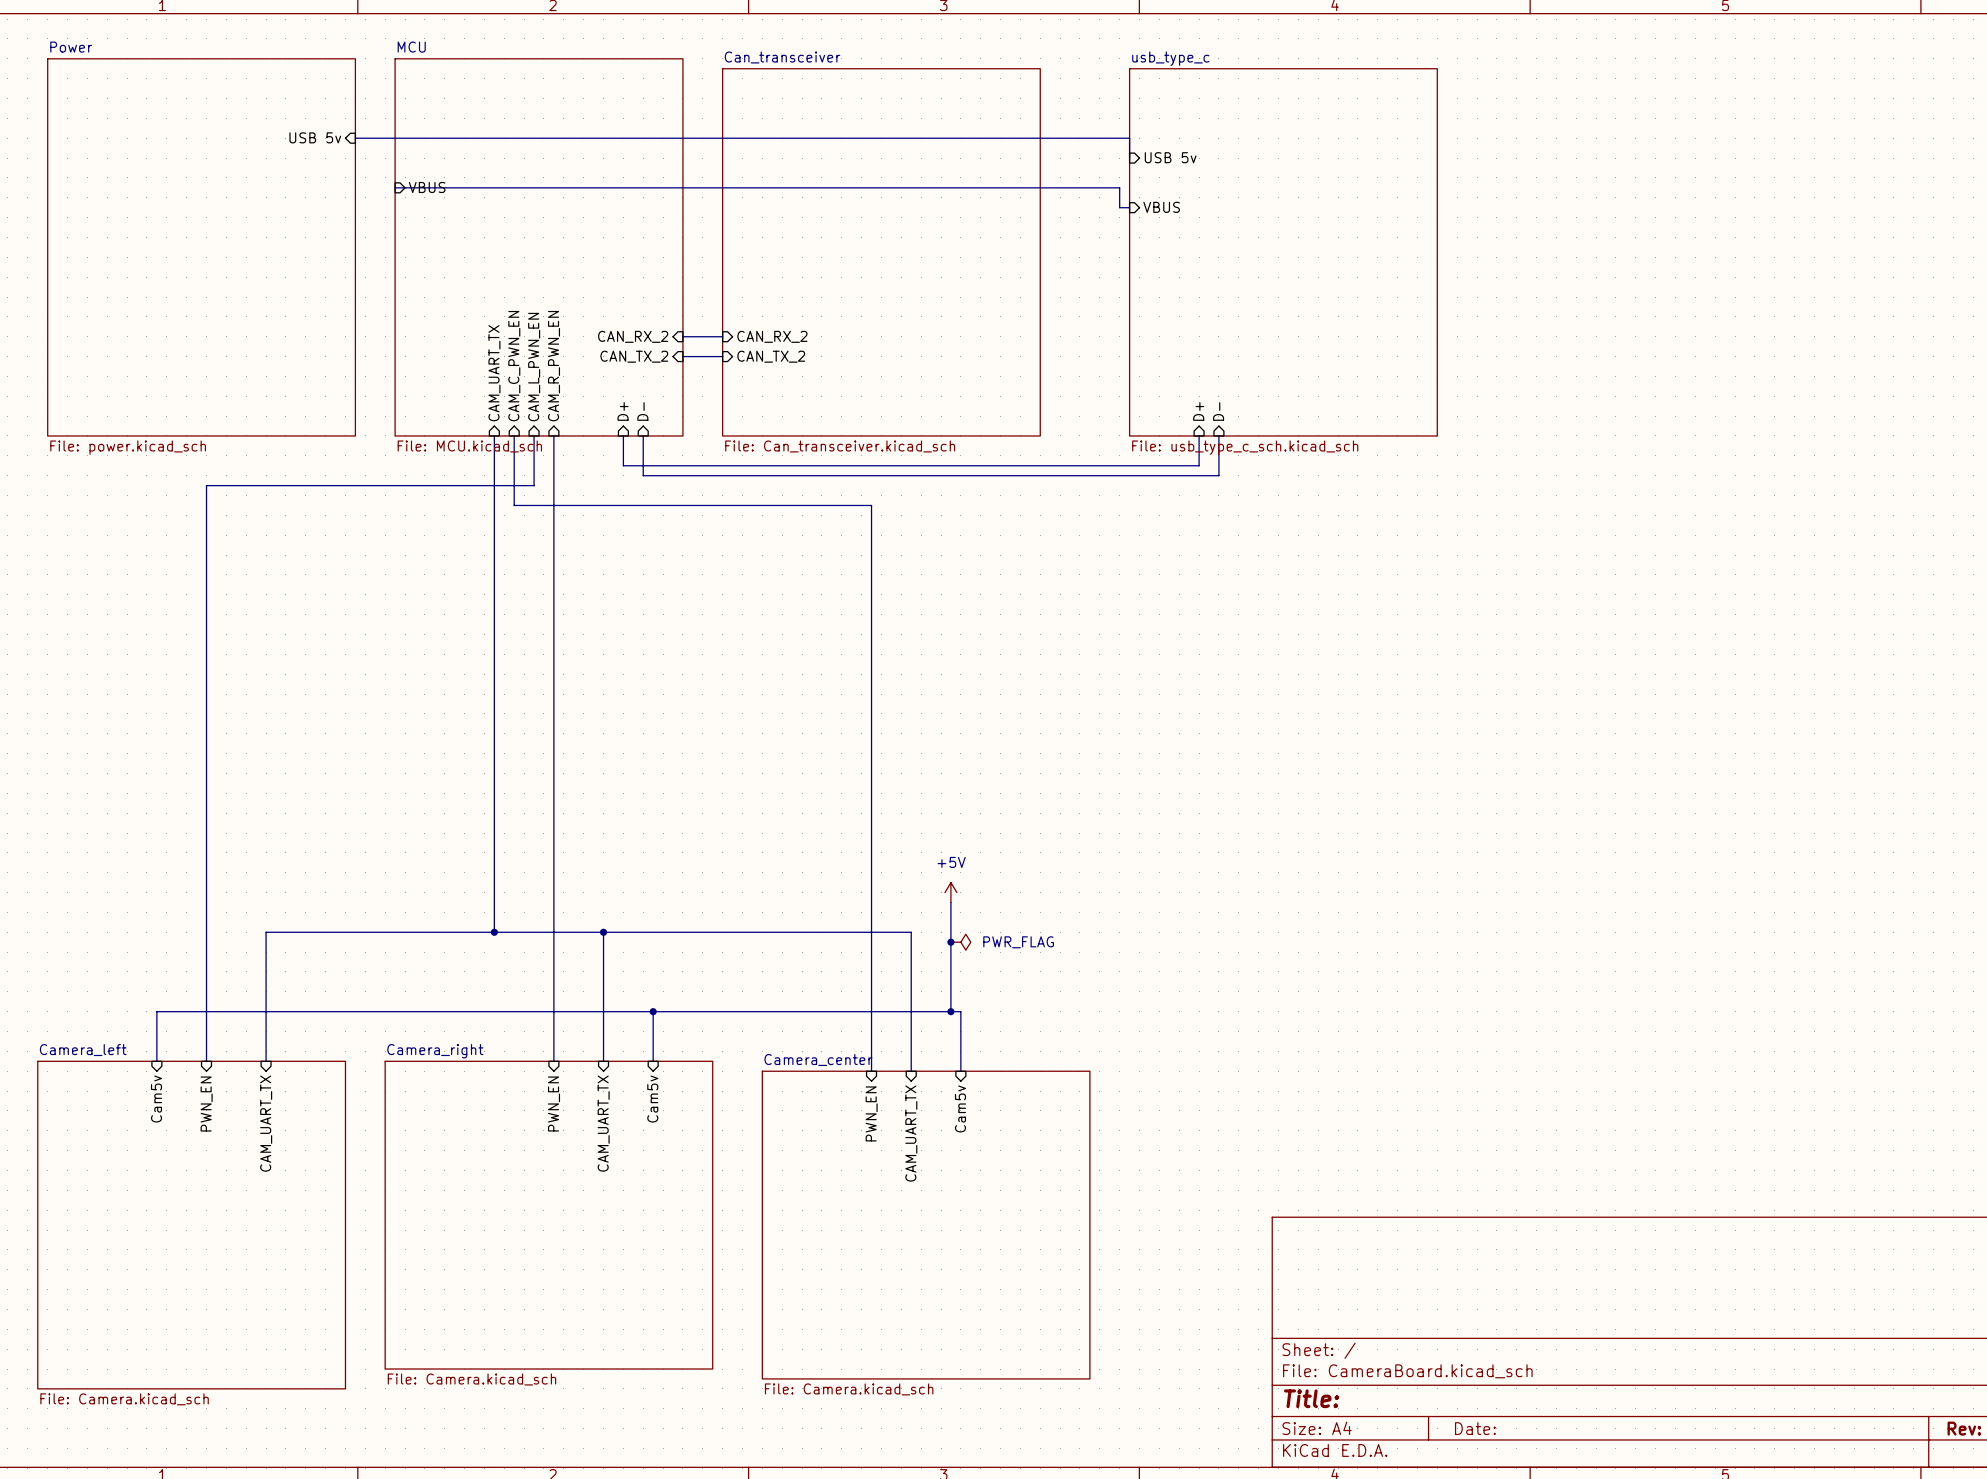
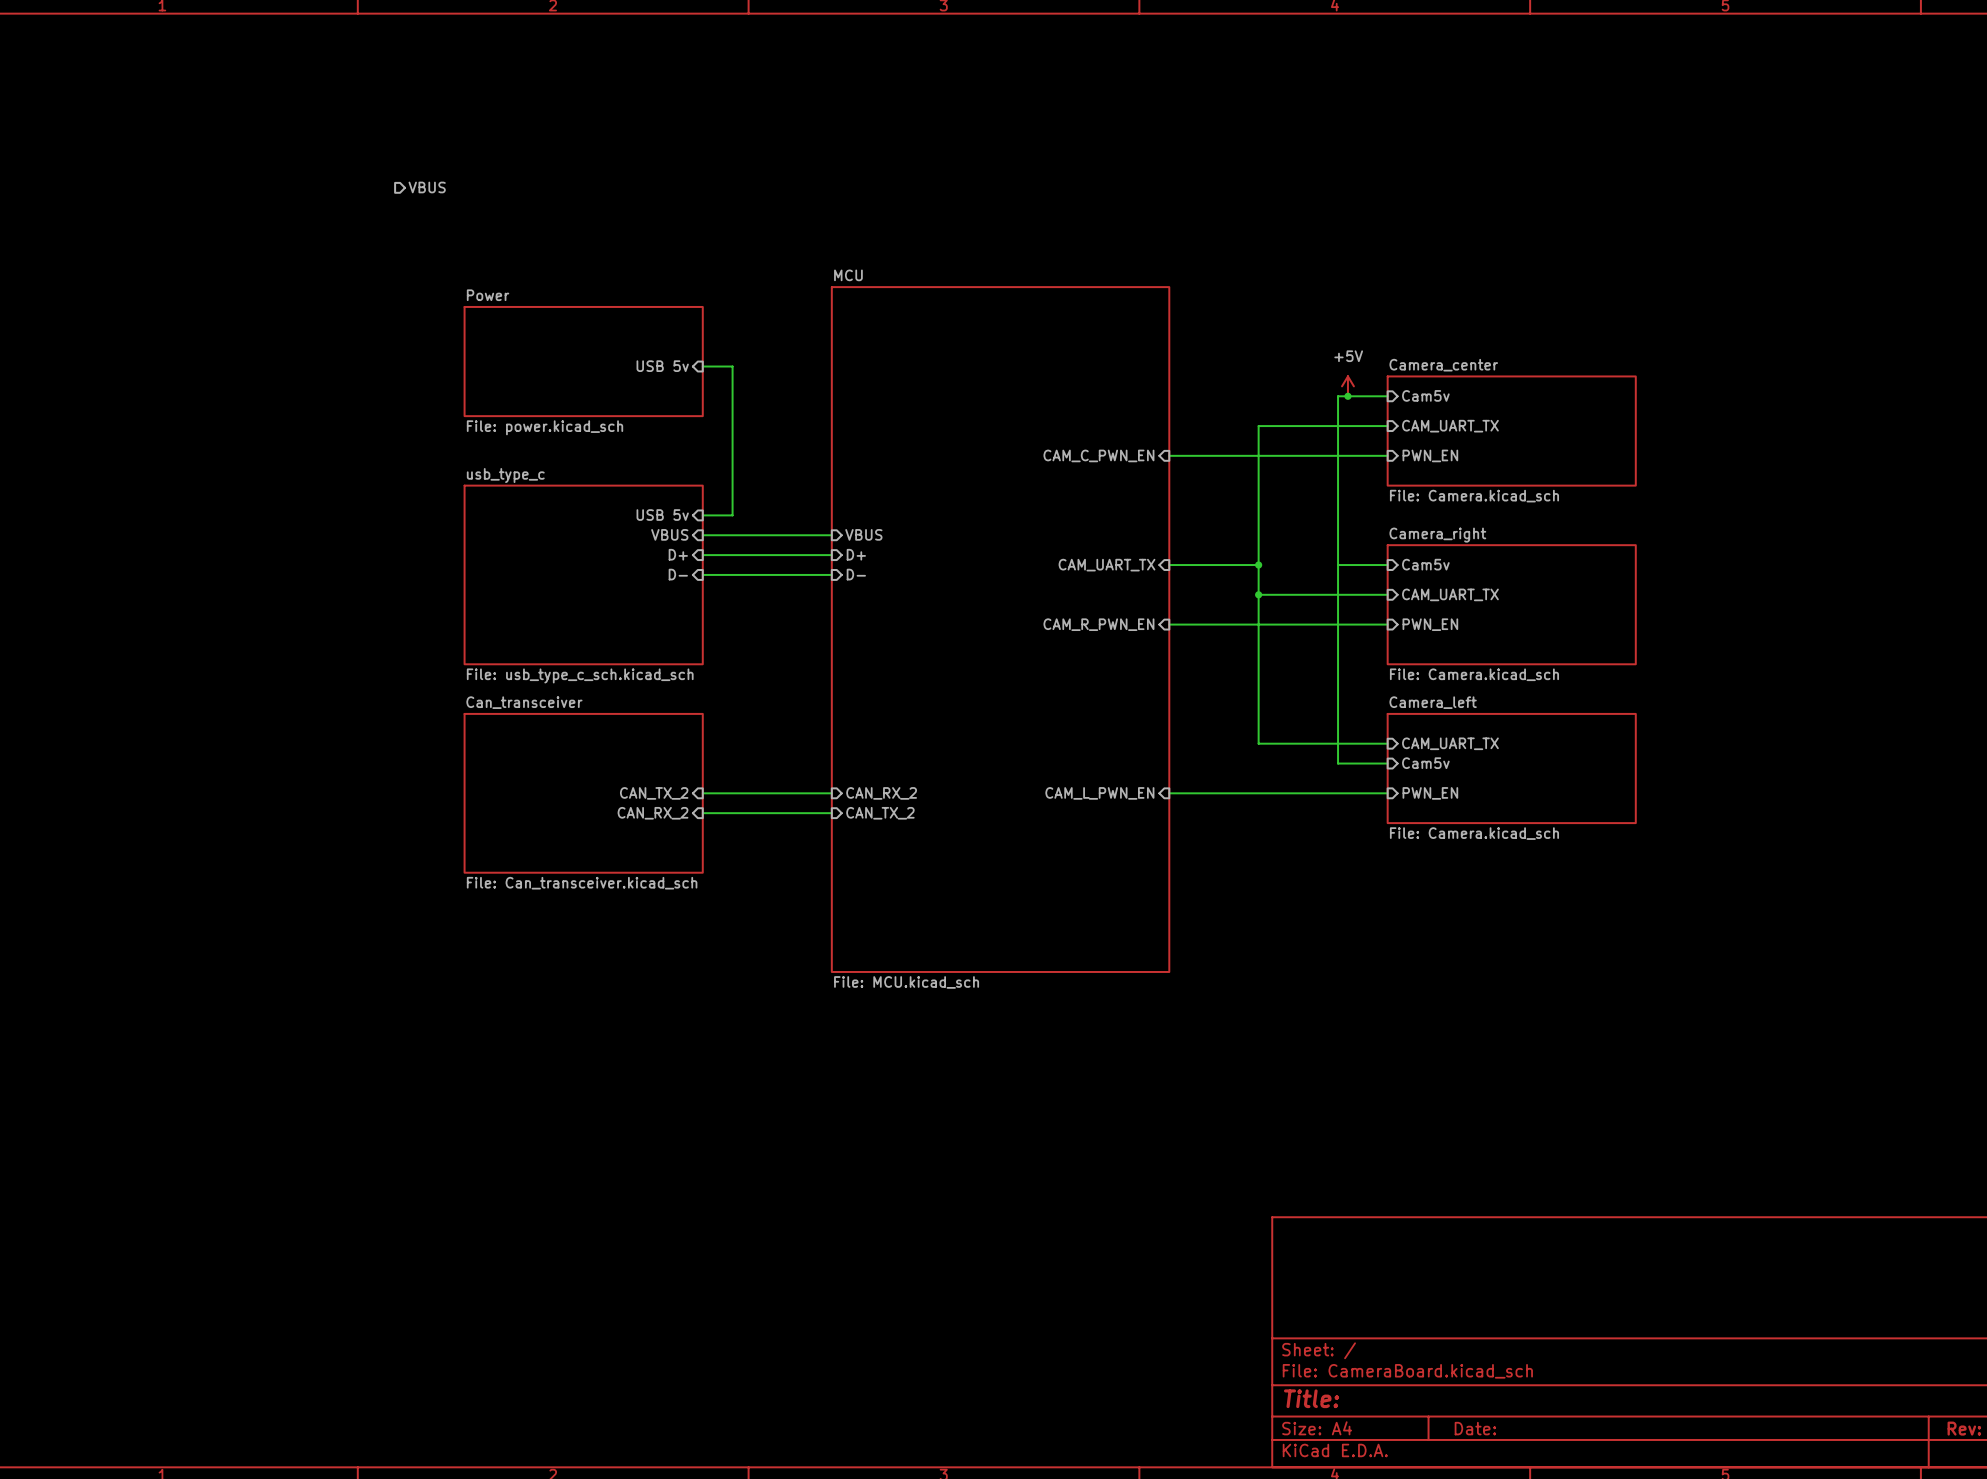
sheet pin: USB 5v (315, 137) -> none
wire: (355, 138) (1129, 138) (1129, 158) -> none
sheet pin: USB 5v (1170, 157) -> none
wire: (395, 187) (1119, 187) (1119, 207) (1129, 207) -> none
sheet pin: VBUS (1161, 207) -> none
sheet Power: File: power.kicad_sch (201, 247) -> none
sheet MCU: File: MCU.kicad_sch (539, 247) -> none
sheet Can_transceiver: File: Can_transceiver.kicad_sch (881, 252) -> none
sheet usb_type_c: File: usb_type_c_sch.kicad_sch (1283, 252) -> none
sheet pin: CAN_RX_2 (633, 336) -> none
wire: (682, 336) (722, 336) -> none
sheet pin: CAN_RX_2 (772, 336) -> none
sheet pin: CAN_TX_2 (634, 356) -> none
wire: (682, 356) (722, 356) -> none
sheet pin: CAN_TX_2 (771, 356) -> none
sheet Power: none -> File: power.kicad_sch (583, 361)
sheet pin: CAM_C_PWN_EN (514, 366) -> none
sheet pin: CAM_R_PWN_EN (554, 366) -> none
sheet pin: none -> USB 5v (662, 366)
wire: none -> (702, 366) (732, 366) (732, 515) (702, 515)
sheet pin: CAM_L_PWN_EN (534, 367) -> none
sheet pin: CAM_UART_TX (494, 373) -> none
power symbol: none -> +5V (1347, 386)
sheet pin: none -> Cam5v (1425, 395)
junction: none -> (1347, 396)
wire: none -> (1387, 396) (1338, 396) (1338, 763) (1387, 763)
sheet pin: D+ (623, 411) -> none
sheet pin: D- (642, 411) -> none
sheet pin: D+ (1198, 411) -> none
sheet pin: D- (1218, 411) -> none
wire: none -> (1387, 426) (1258, 426) (1258, 743) (1387, 743)
sheet pin: none -> CAM_UART_TX (1450, 426)
sheet Camera_center: none -> File: Camera.kicad_sch (1511, 431)
wire: (494, 435) (494, 932) -> none
wire: (514, 435) (514, 505) (871, 505) (871, 1071) -> none
wire: (534, 435) (534, 485) (206, 485) (206, 1061) -> none
wire: (553, 435) (553, 1061) -> none
wire: (623, 435) (623, 465) (1199, 465) (1199, 435) -> none
wire: (643, 435) (643, 475) (1218, 475) (1218, 435) -> none
sheet pin: none -> CAM_C_PWN_EN (1098, 455)
wire: none -> (1169, 455) (1387, 455)
sheet pin: none -> PWN_EN (1430, 455)
sheet pin: none -> USB 5v (662, 515)
sheet pin: none -> VBUS (669, 534)
sheet pin: none -> VBUS (863, 534)
wire: none -> (702, 535) (831, 535)
sheet pin: none -> D+ (678, 554)
sheet pin: none -> D+ (856, 554)
wire: none -> (702, 555) (831, 555)
sheet pin: none -> Cam5v (1425, 564)
sheet pin: none -> CAM_UART_TX (1106, 565)
wire: none -> (1169, 565) (1258, 565)
junction: none -> (1258, 565)
wire: none -> (1338, 565) (1387, 565)
sheet usb_type_c: none -> File: usb_type_c_sch.kicad_sch (583, 574)
sheet pin: none -> D- (678, 574)
wire: none -> (702, 574) (831, 574)
sheet pin: none -> D- (856, 574)
wire: none -> (1258, 594) (1387, 594)
junction: none -> (1258, 594)
sheet pin: none -> CAM_UART_TX (1450, 594)
sheet Camera_right: none -> File: Camera.kicad_sch (1511, 604)
sheet pin: none -> CAM_R_PWN_EN (1098, 624)
wire: none -> (1169, 624) (1387, 624)
sheet pin: none -> PWN_EN (1430, 624)
sheet MCU: none -> File: MCU.kicad_sch (1000, 629)
sheet pin: none -> CAM_UART_TX (1450, 743)
sheet pin: none -> Cam5v (1425, 763)
sheet Camera_left: none -> File: Camera.kicad_sch (1511, 768)
sheet Can_transceiver: none -> File: Can_transceiver.kicad_sch (583, 793)
sheet pin: none -> CAN_TX_2 (654, 793)
wire: none -> (702, 793) (831, 793)
sheet pin: none -> CAN_RX_2 (881, 793)
sheet pin: none -> CAM_L_PWN_EN (1099, 793)
wire: none -> (1169, 793) (1387, 793)
sheet pin: none -> PWN_EN (1430, 793)
sheet pin: none -> CAN_RX_2 (653, 813)
wire: none -> (702, 813) (831, 813)
sheet pin: none -> CAN_TX_2 (880, 813)
power symbol: +5V (950, 892) -> none
wire: (950, 902) (950, 1011) -> none
junction: (494, 932) -> none
wire: (603, 932) (603, 1061) -> none
junction: (603, 932) -> none
junction: (950, 942) -> none
power symbol: PWR_FLAG (960, 942) -> none
wire: (653, 1011) (653, 1061) -> none
junction: (653, 1011) -> none
junction: (950, 1011) -> none
wire: (156, 1061) (156, 1011) (960, 1011) (960, 1071) -> none
wire: (266, 1061) (266, 932) (911, 932) (911, 1071) -> none
sheet pin: Cam5v (156, 1099) -> none
sheet pin: Cam5v (652, 1099) -> none
sheet pin: PWN_EN (206, 1104) -> none
sheet pin: PWN_EN (554, 1104) -> none
sheet pin: Cam5v (960, 1108) -> none
sheet pin: PWN_EN (871, 1113) -> none
sheet pin: CAM_UART_TX (266, 1123) -> none
sheet pin: CAM_UART_TX (603, 1123) -> none
sheet pin: CAM_UART_TX (911, 1133) -> none
sheet Camera_right: File: Camera.kicad_sch (548, 1215) -> none
sheet Camera_left: File: Camera.kicad_sch (191, 1225) -> none
sheet Camera_center: File: Camera.kicad_sch (926, 1225) -> none

